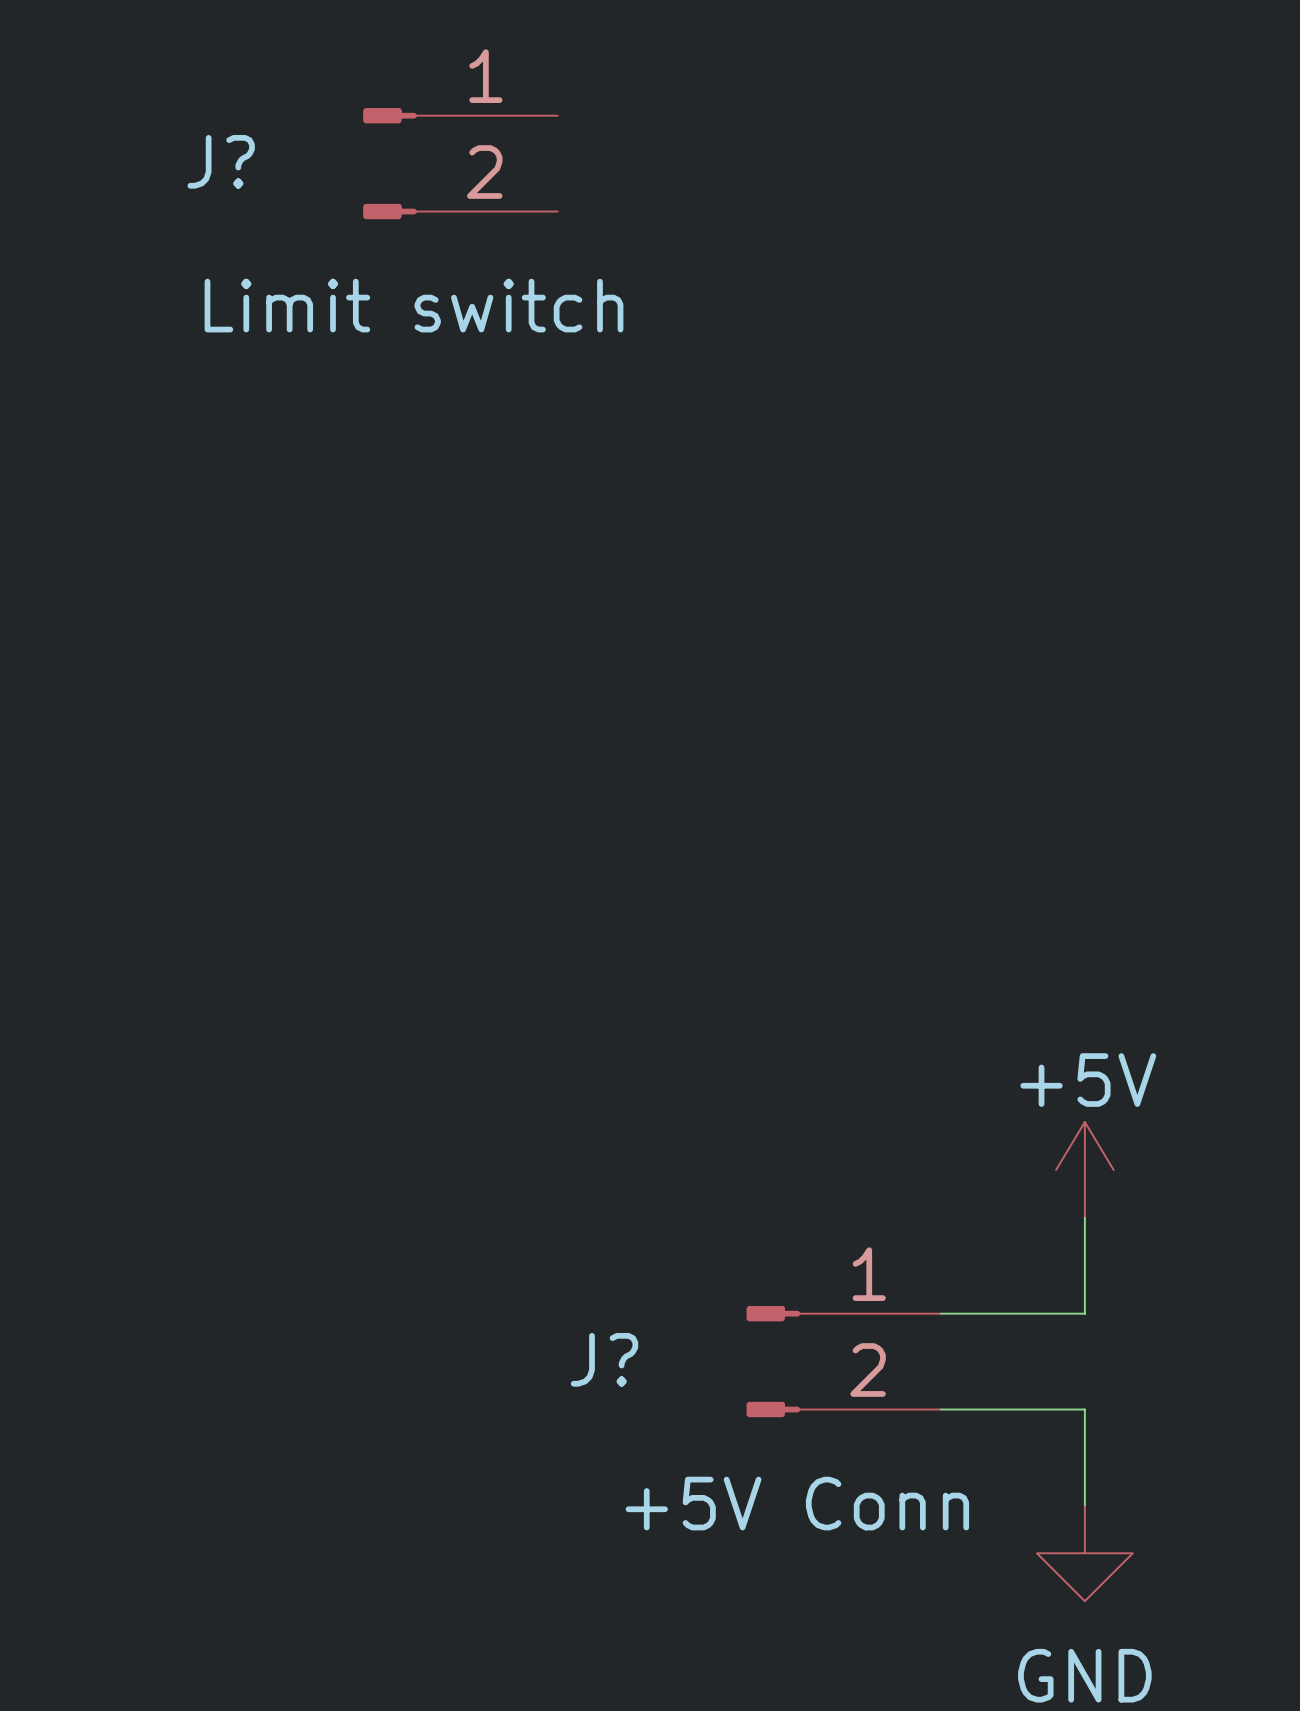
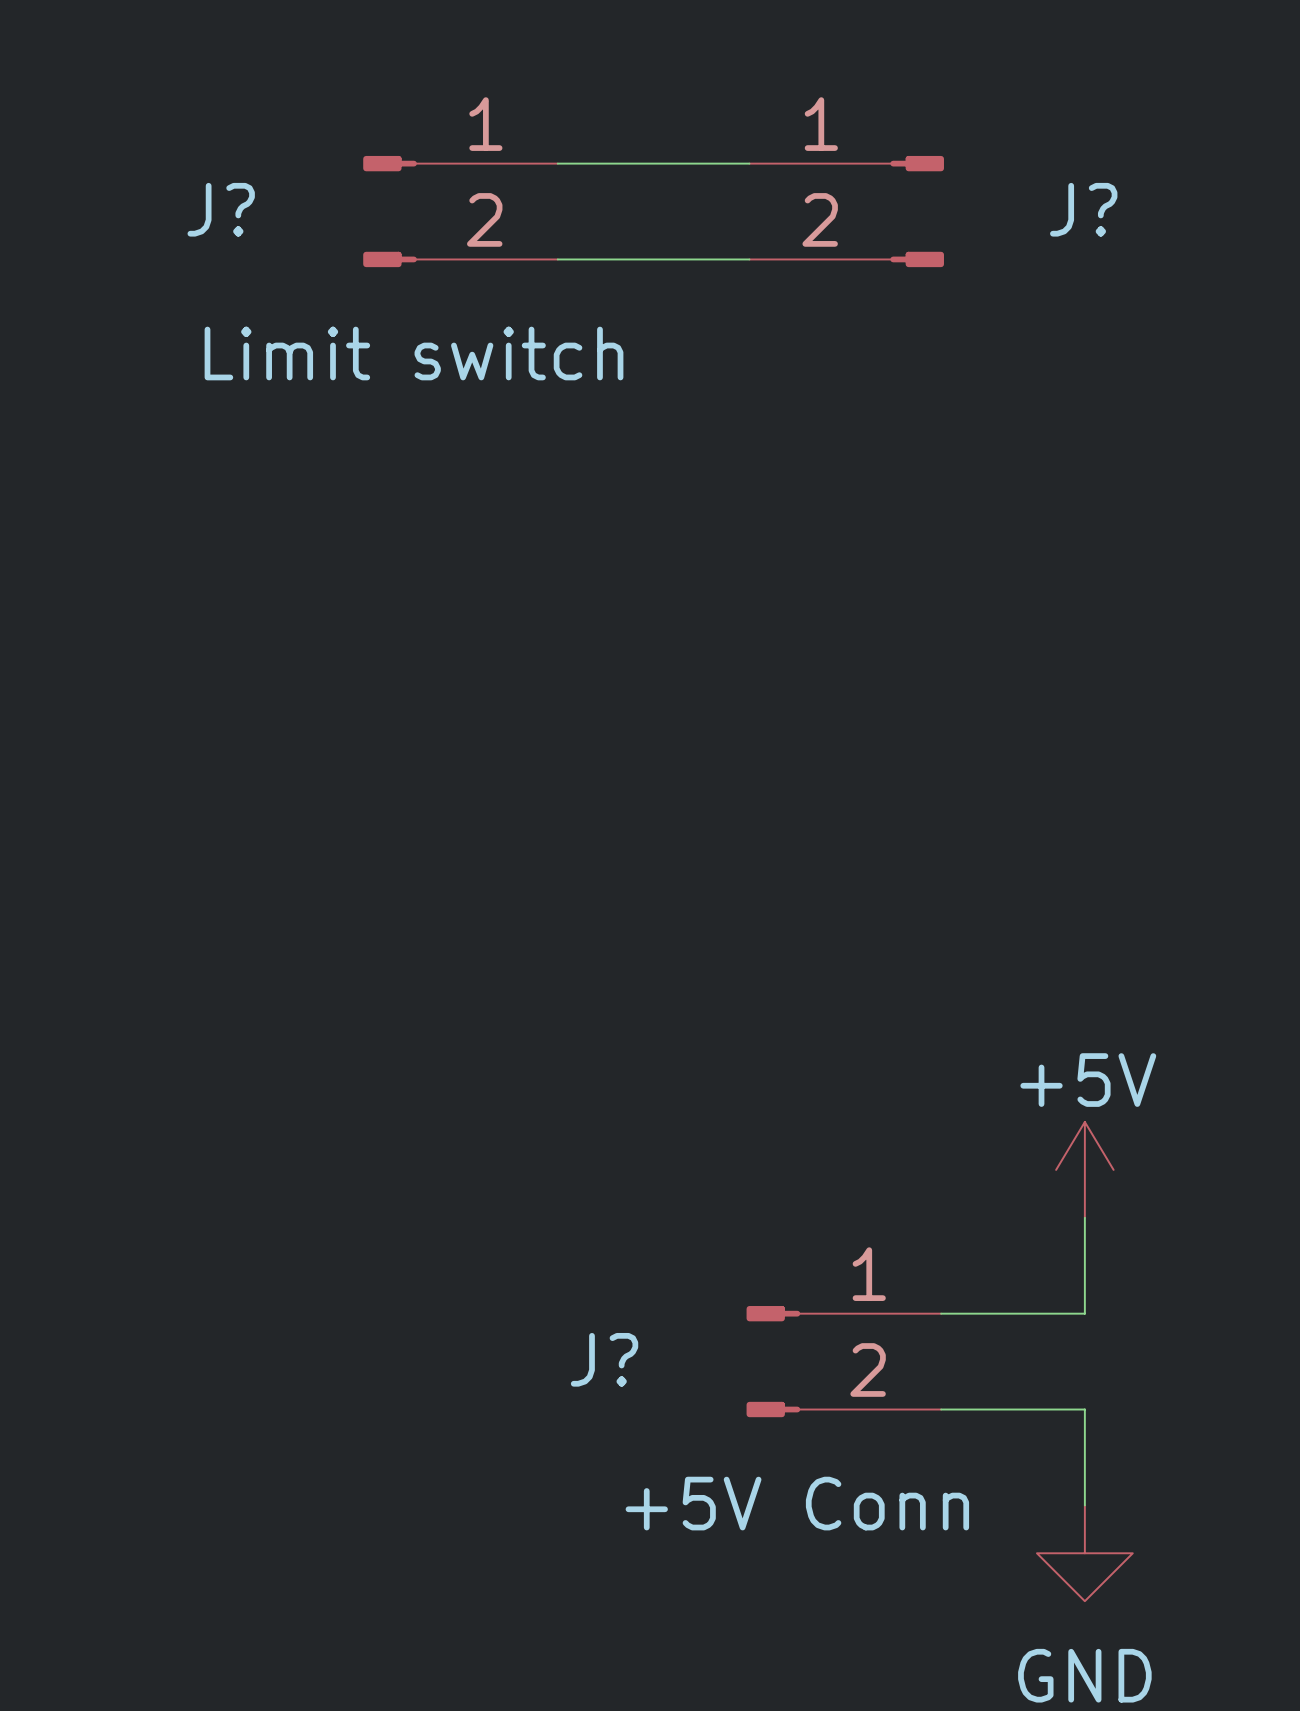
J? position: (460, 163) -> (460, 211)
wire: none -> (557, 163) (749, 163)
J?: none -> (846, 211)
wire: none -> (557, 259) (749, 259)

